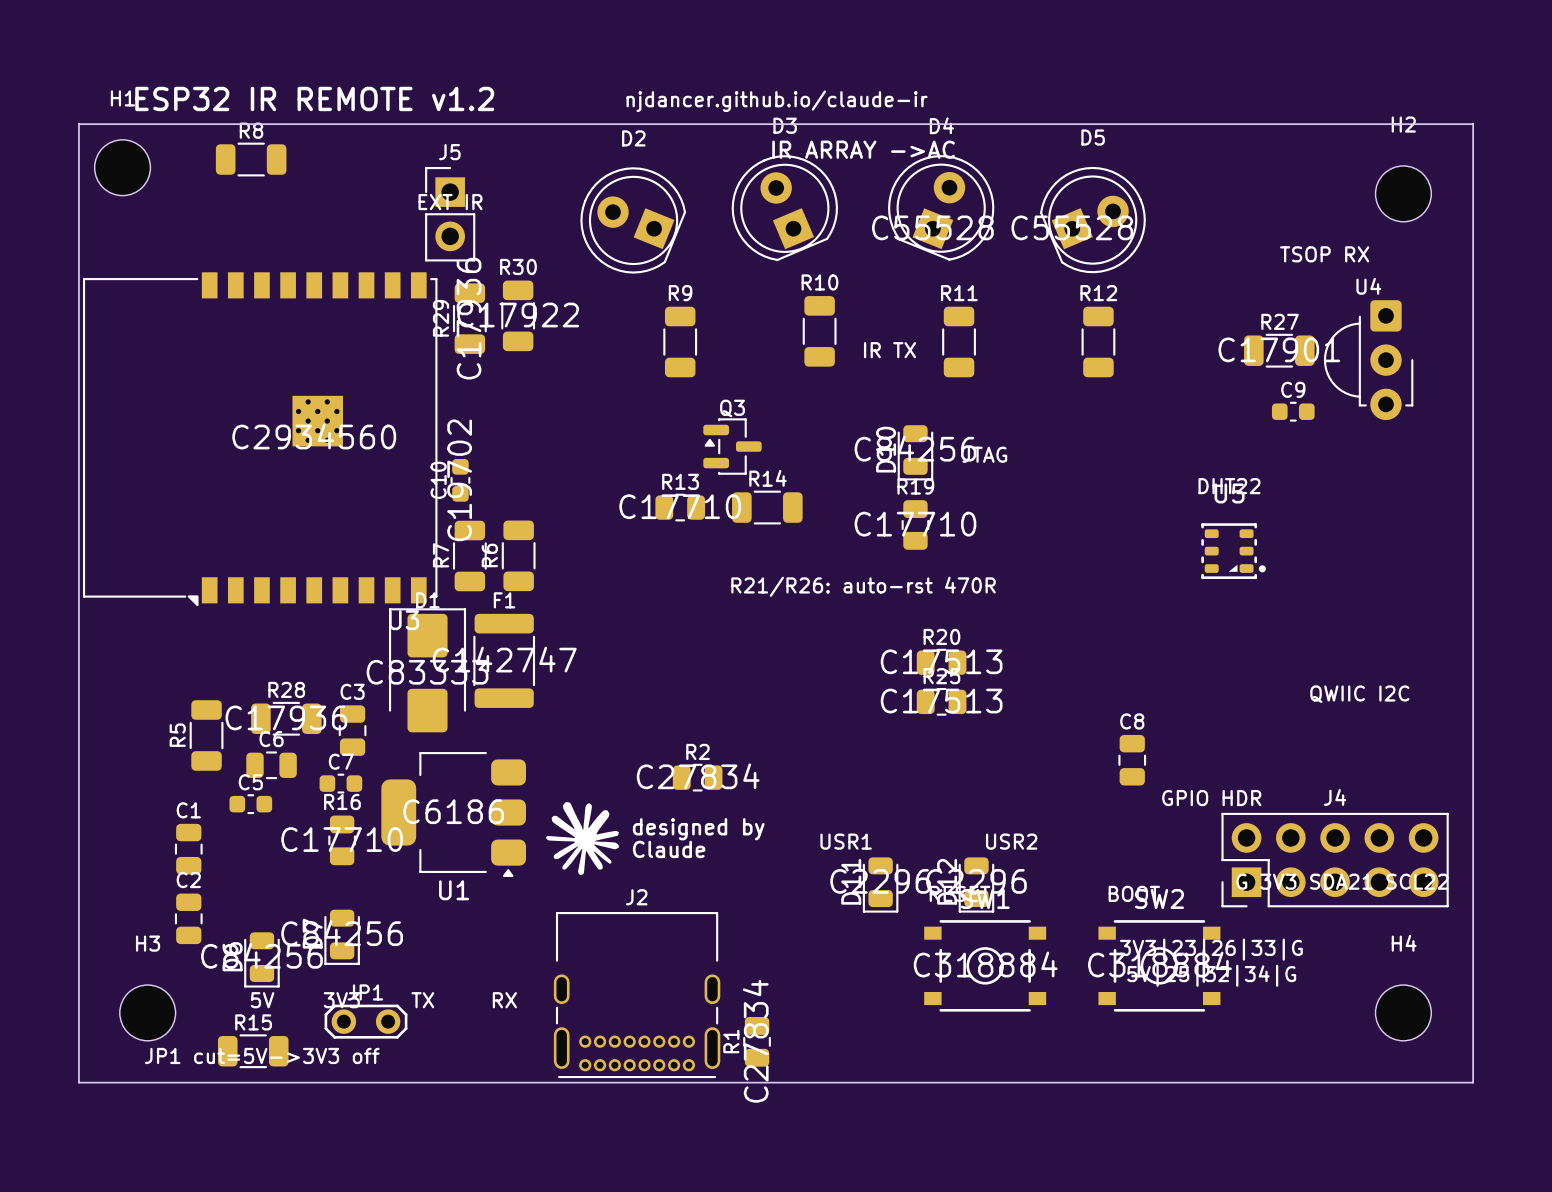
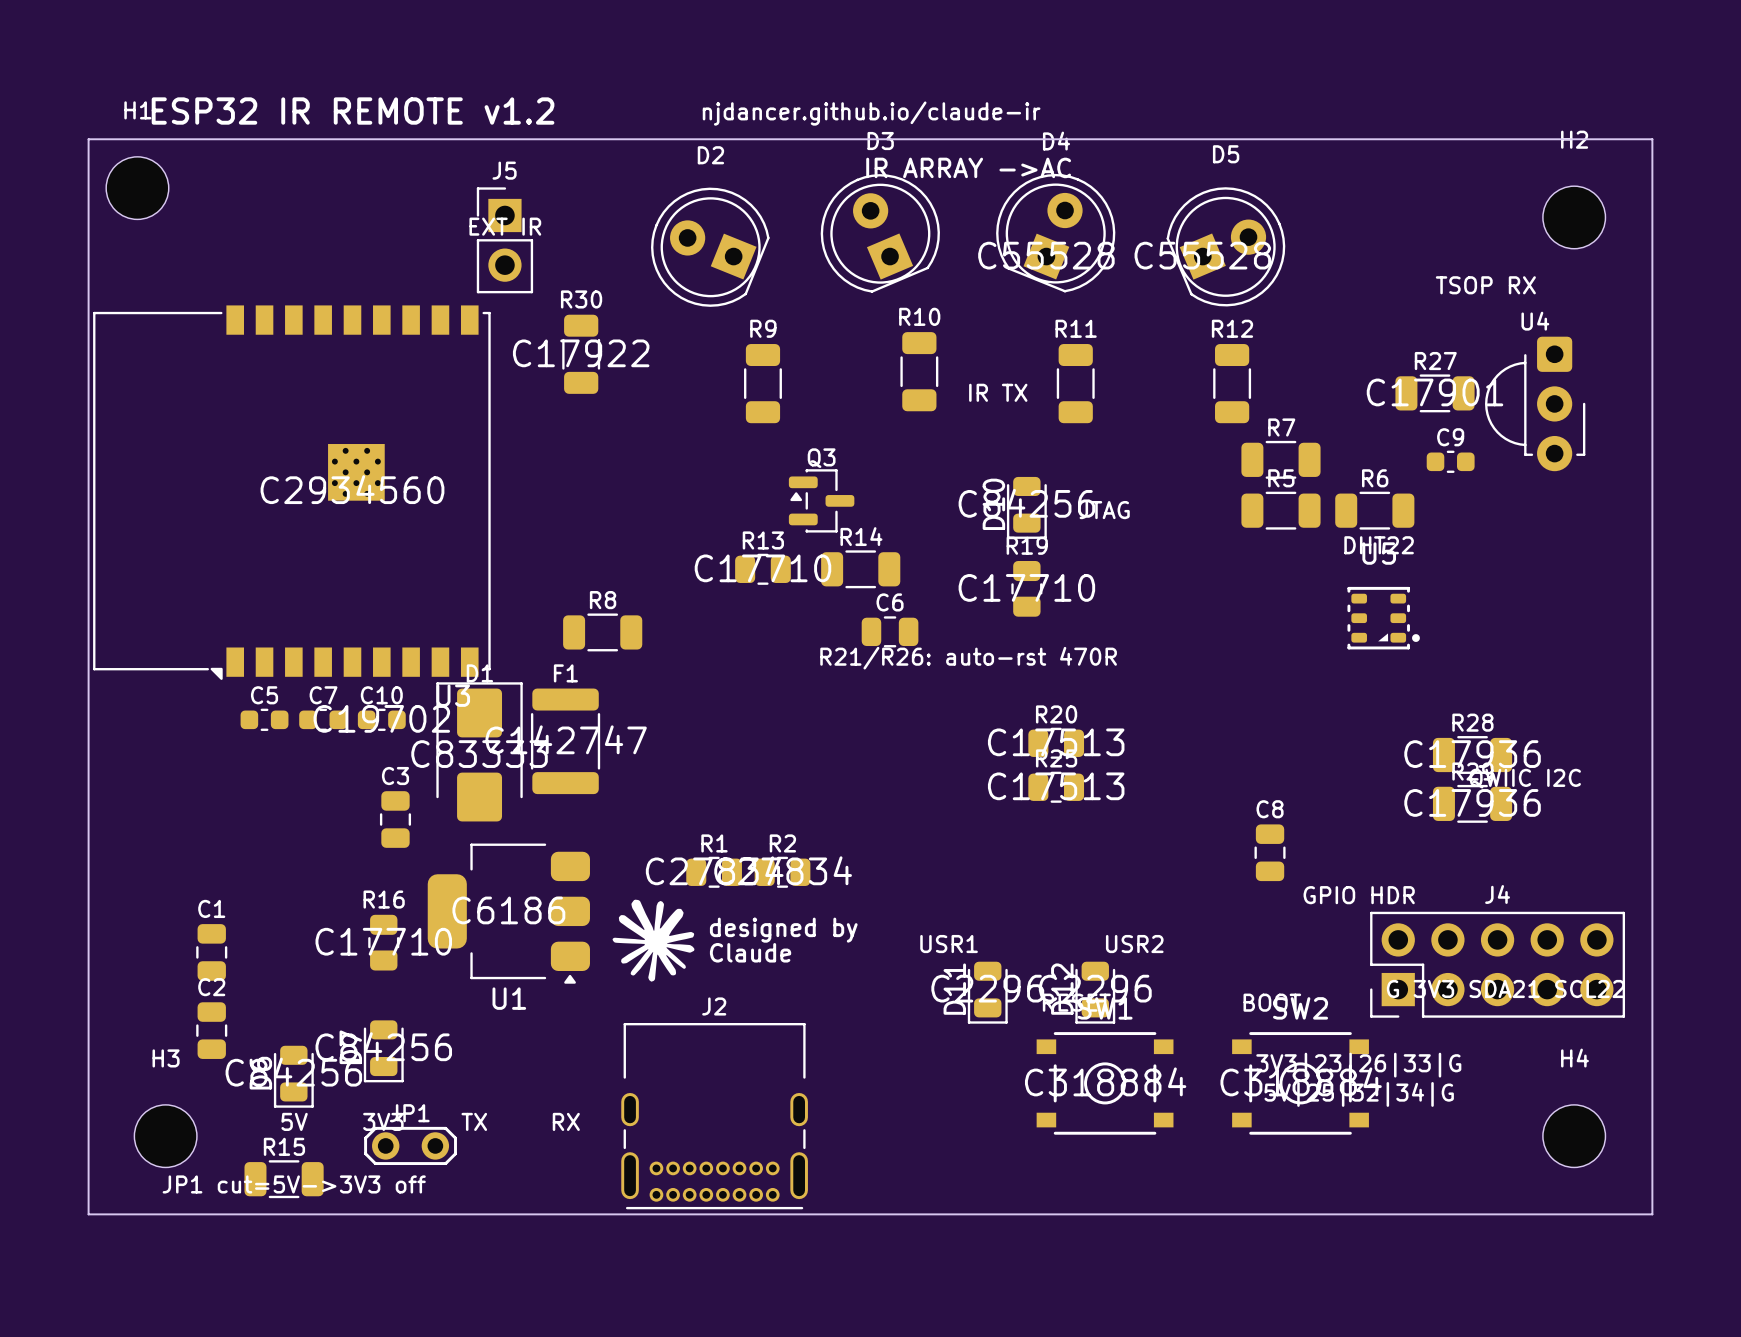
R8 position: (251, 159) -> (602, 632)
R29 rotation: 0° (469, 318) -> 90° clockwise (1472, 803)
R29 position: (469, 318) -> (1472, 803)
C10 rotation: 0° (460, 480) -> 90° clockwise (381, 719)
C10 position: (460, 480) -> (381, 719)
R7 rotation: 0° (469, 555) -> 90° clockwise (1280, 459)
R7 position: (469, 555) -> (1280, 459)
R6 rotation: 0° (518, 555) -> 90° clockwise (1374, 510)
R6 position: (518, 555) -> (1374, 510)
R28 position: (286, 718) -> (1472, 755)
R5 rotation: 0° (206, 735) -> 90° clockwise (1280, 510)
R5 position: (206, 735) -> (1280, 510)
C6 position: (271, 765) -> (890, 631)
C7 position: (340, 783) -> (323, 719)
C5 position: (250, 804) -> (264, 719)
R1 rotation: 0° (757, 1041) -> 90° clockwise (714, 872)
R1 position: (757, 1041) -> (714, 872)

